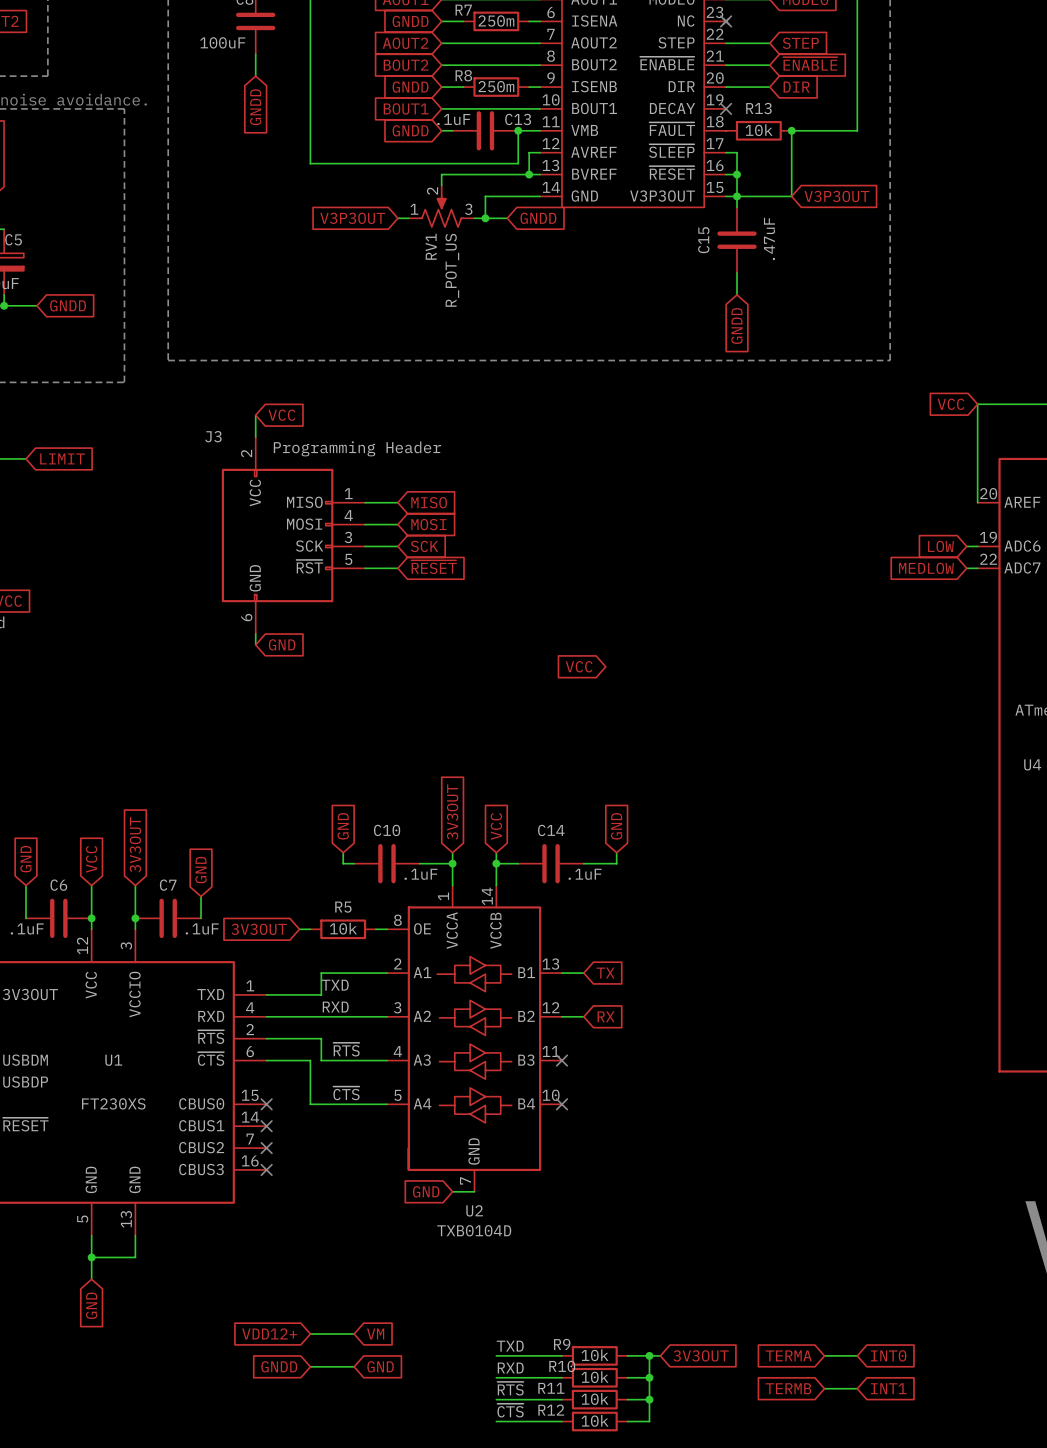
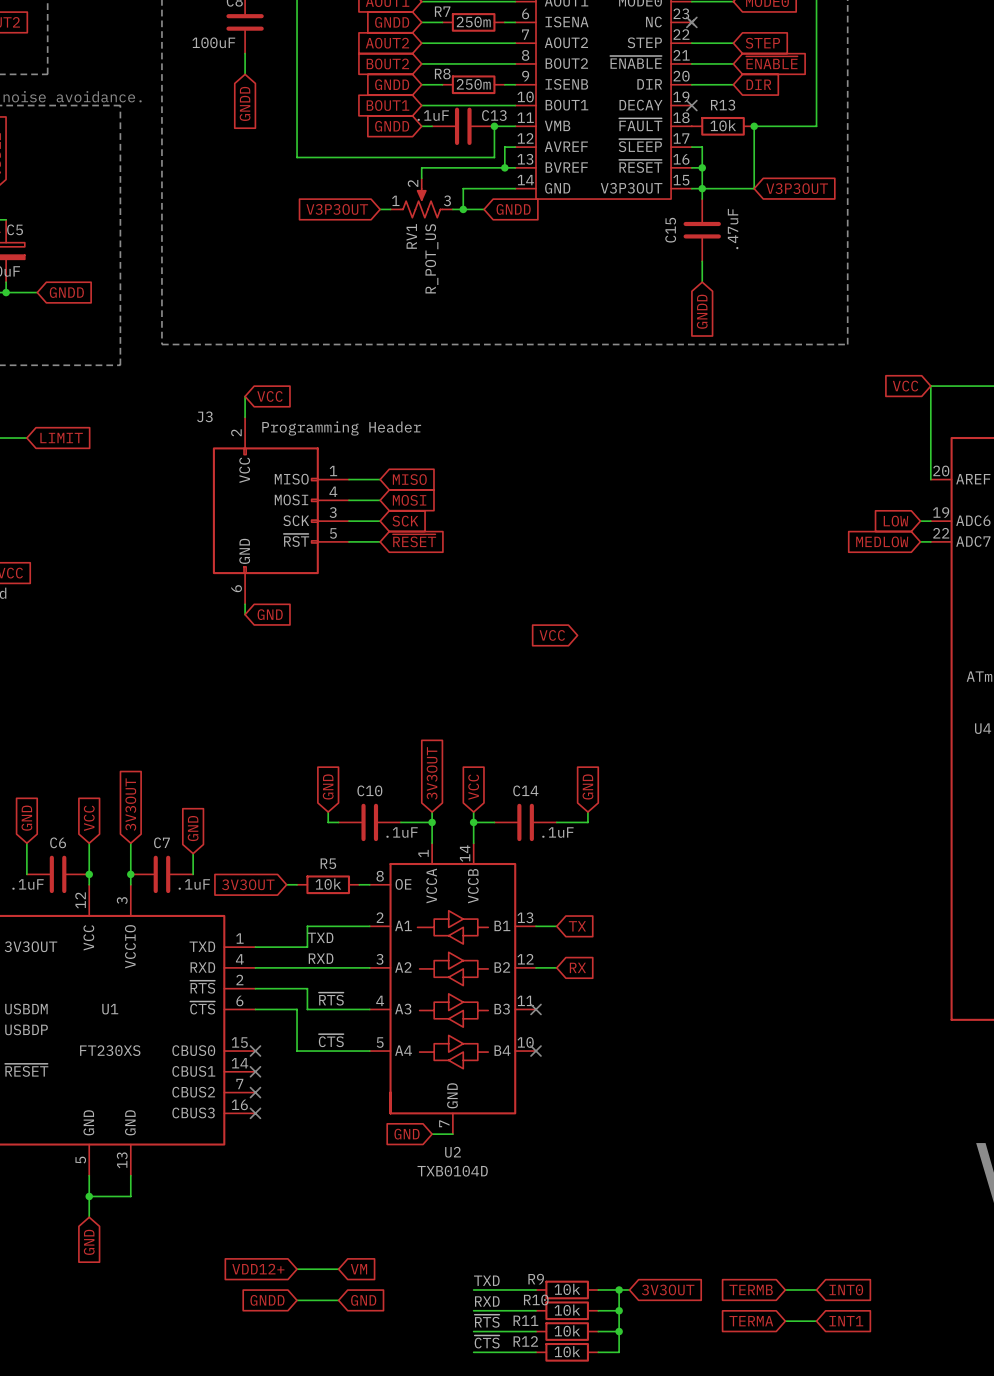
global label: TERMA (788, 1355) -> TERMB (751, 1289)
global label: TERMB (788, 1388) -> TERMA (751, 1321)

